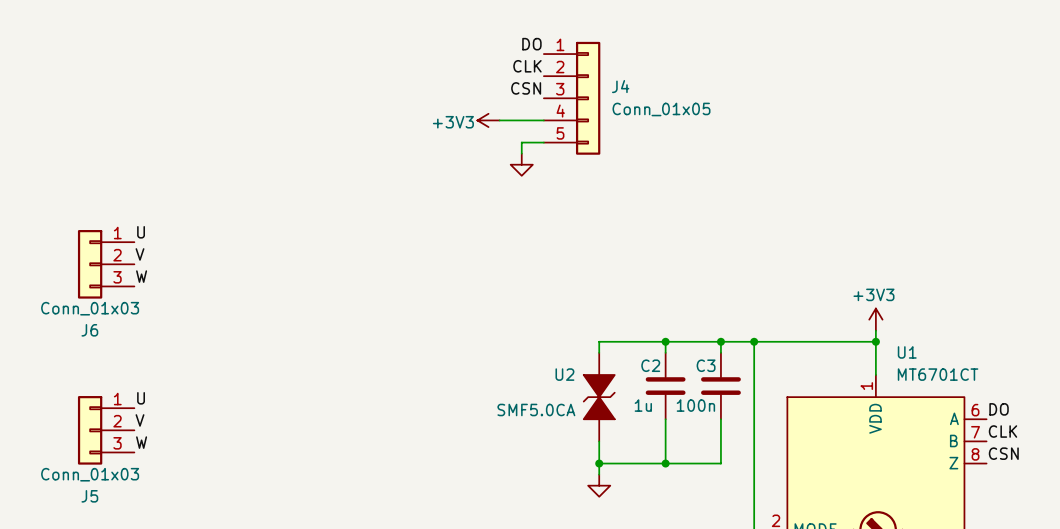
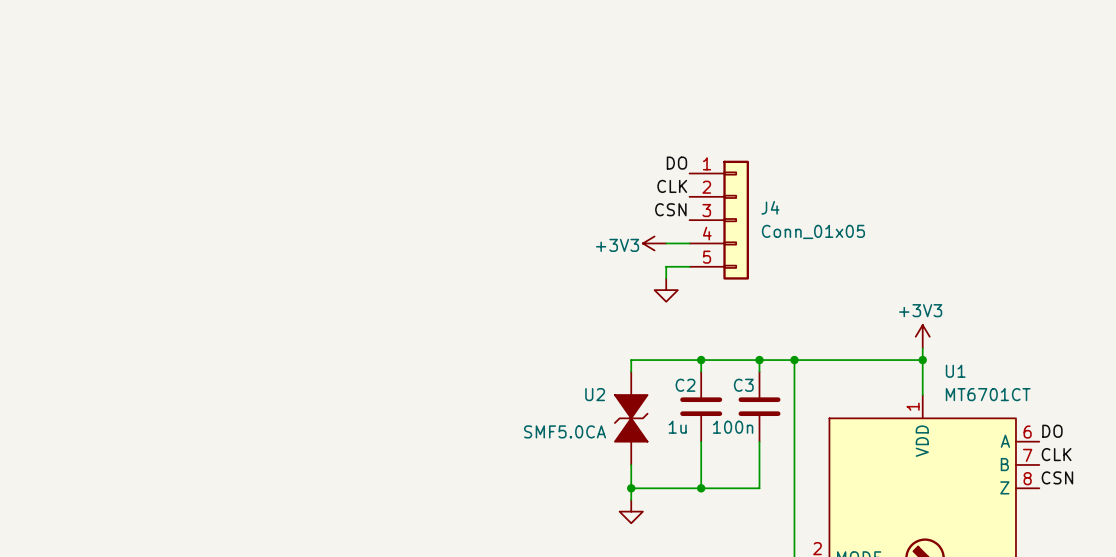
label position: DO (531, 44) -> DO (676, 163)
label position: CLK (527, 66) -> CLK (672, 186)
label position: CSN (526, 88) -> CSN (670, 209)
J4 position: (572, 98) -> (719, 220)
power symbol position: +3V3 (488, 120) -> +3V3 (654, 243)
wire: (499, 120) (543, 120) -> none
wire: (543, 142) (521, 142) (521, 153) -> (689, 266) (666, 266) (666, 278)
power symbol position: (521, 164) -> (666, 290)
wire: none -> (666, 243) (689, 243)
label: U (141, 232) -> none
label: V (140, 254) -> none
J6: Conn_01x03 (106, 264) -> none
label: W (141, 276) -> none
label: U (141, 398) -> none
label: V (140, 420) -> none
J5: Conn_01x03 (106, 430) -> none
label: W (141, 442) -> none

